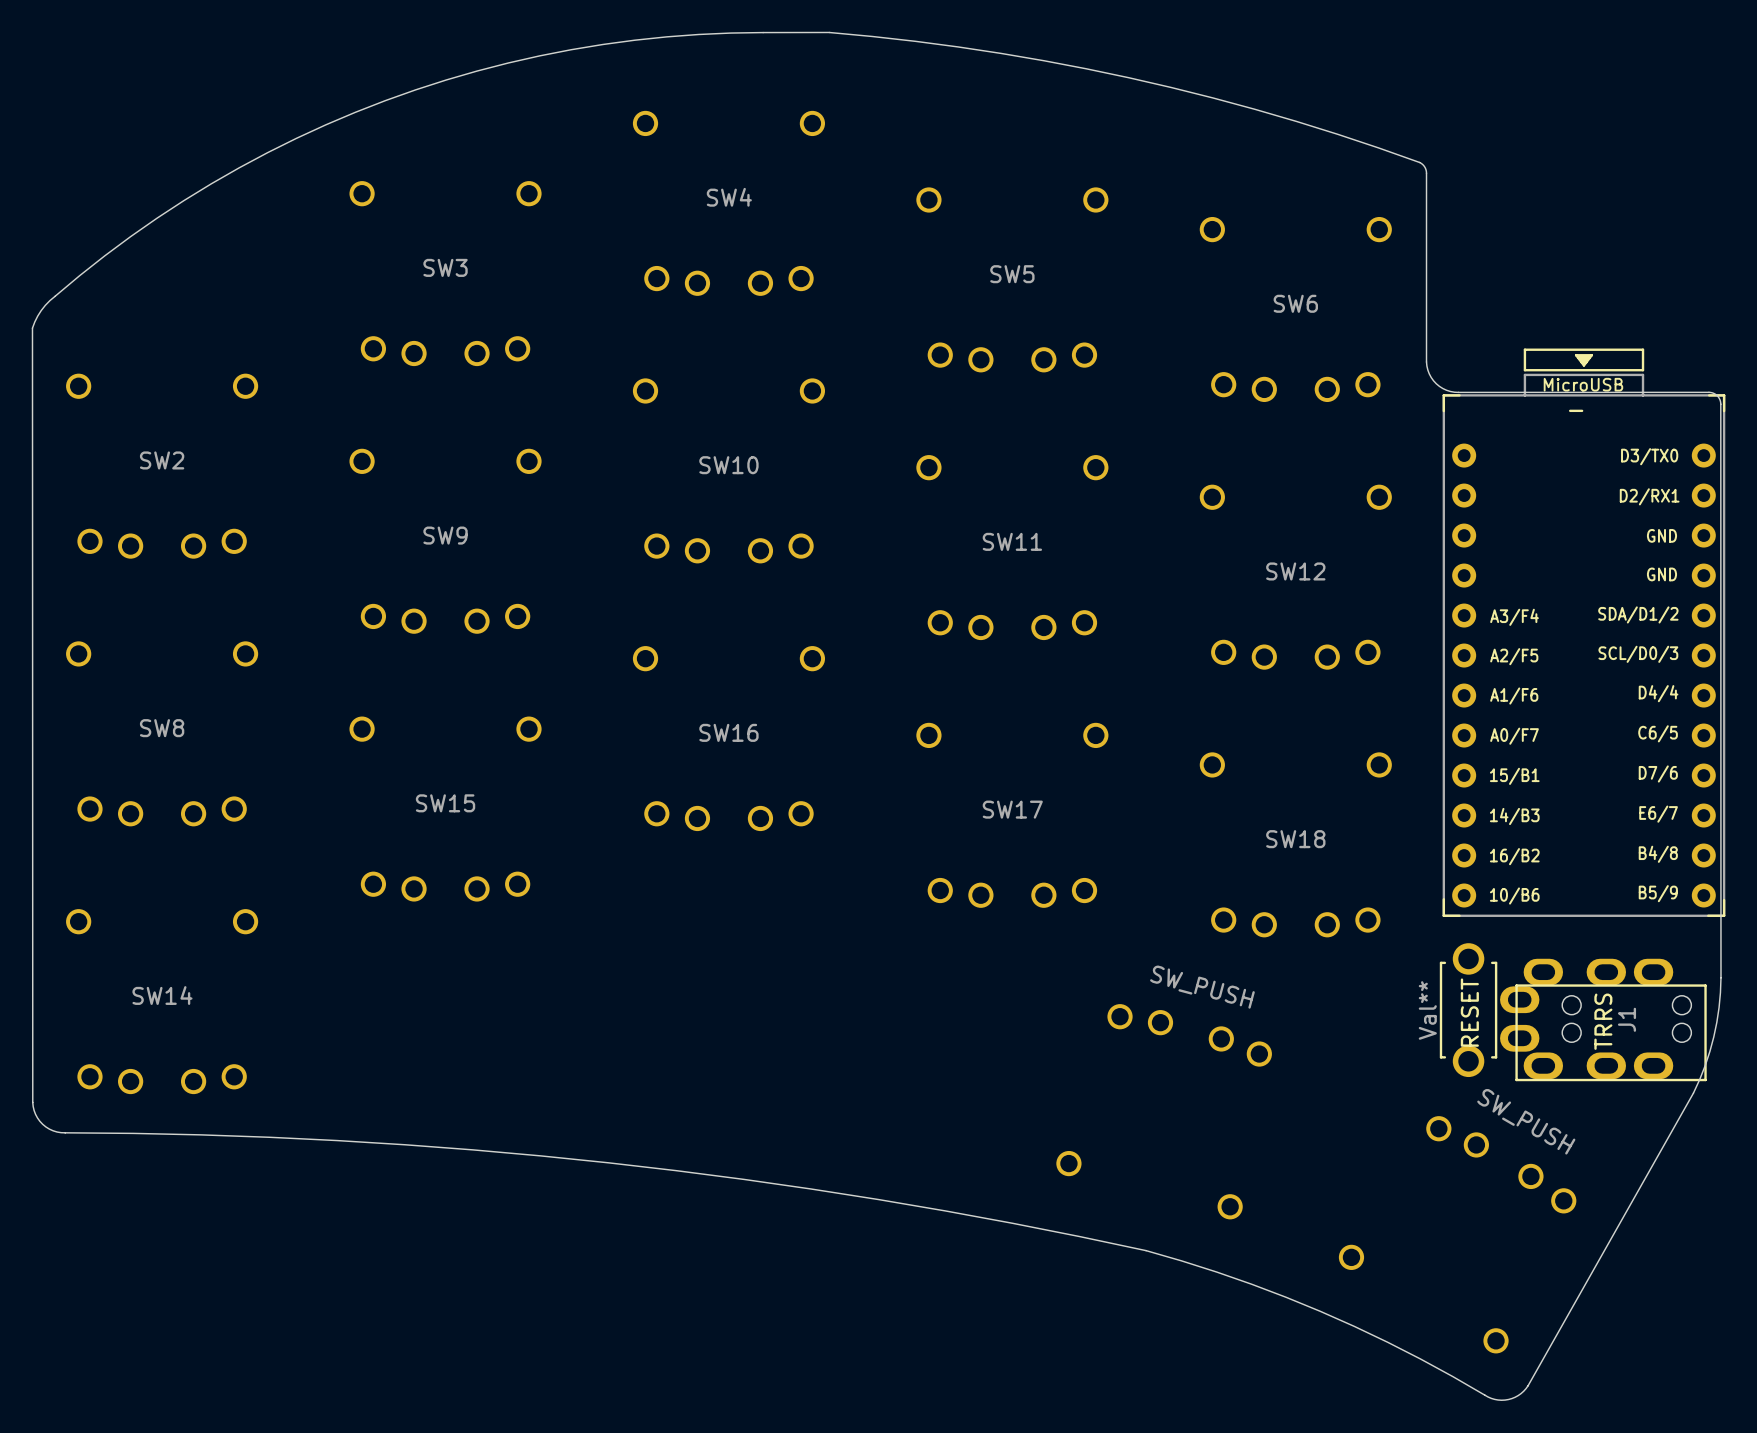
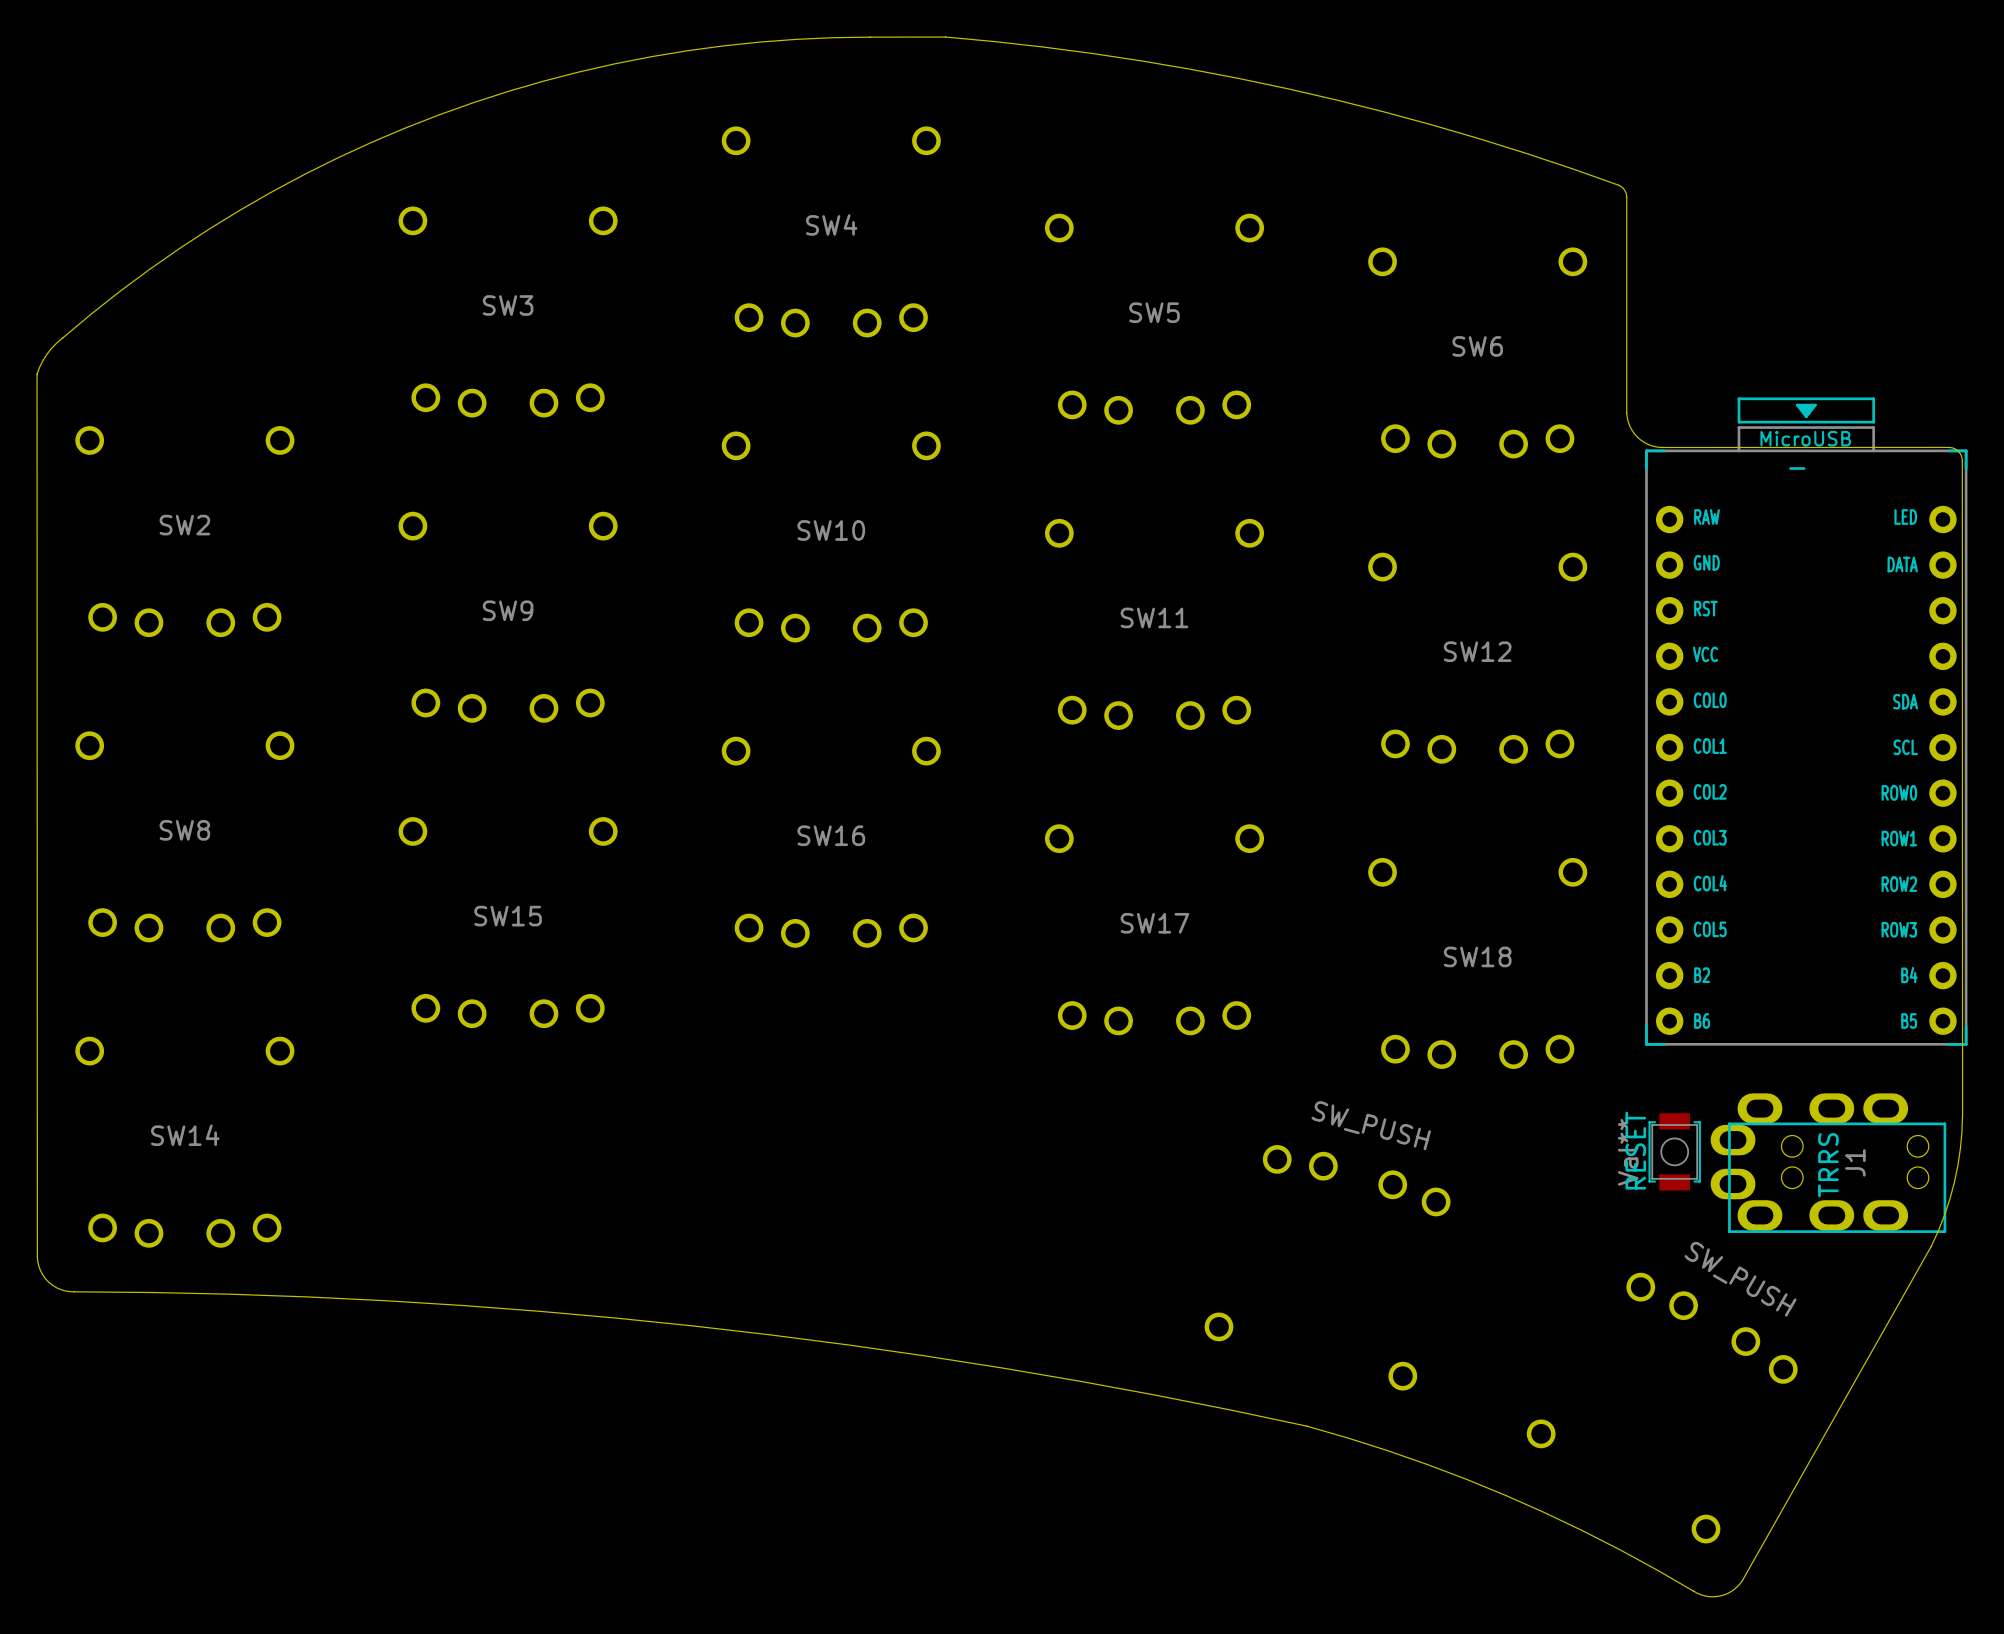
part footprint: [1442, 348, 1726, 917] -> [1645, 397, 1968, 1046]
text: none -> RAW (1707, 517)
text: none -> LED (1905, 517)
text: none -> GND (1706, 562)
text: none -> DATA (1902, 564)
text: none -> RST (1705, 608)
text: none -> VCC (1705, 654)
text: none -> COL0 (1710, 700)
text: none -> SDA (1905, 701)
text: none -> COL1 (1710, 746)
text: none -> SCL (1905, 747)
text: none -> COL2 (1710, 791)
text: none -> ROW0 (1899, 792)
text: none -> COL3 (1710, 837)
text: none -> ROW1 (1899, 838)
text: none -> COL4 (1710, 883)
text: none -> ROW2 (1899, 884)
text: none -> COL5 (1710, 929)
text: none -> ROW3 (1899, 929)
text: none -> B2 (1702, 975)
text: none -> B4 (1909, 975)
text: none -> B6 (1702, 1020)
text: none -> B5 (1909, 1020)
part footprint: [1439, 943, 1498, 1078] -> [1648, 1113, 1701, 1191]
part: none -> (1635, 1150)

